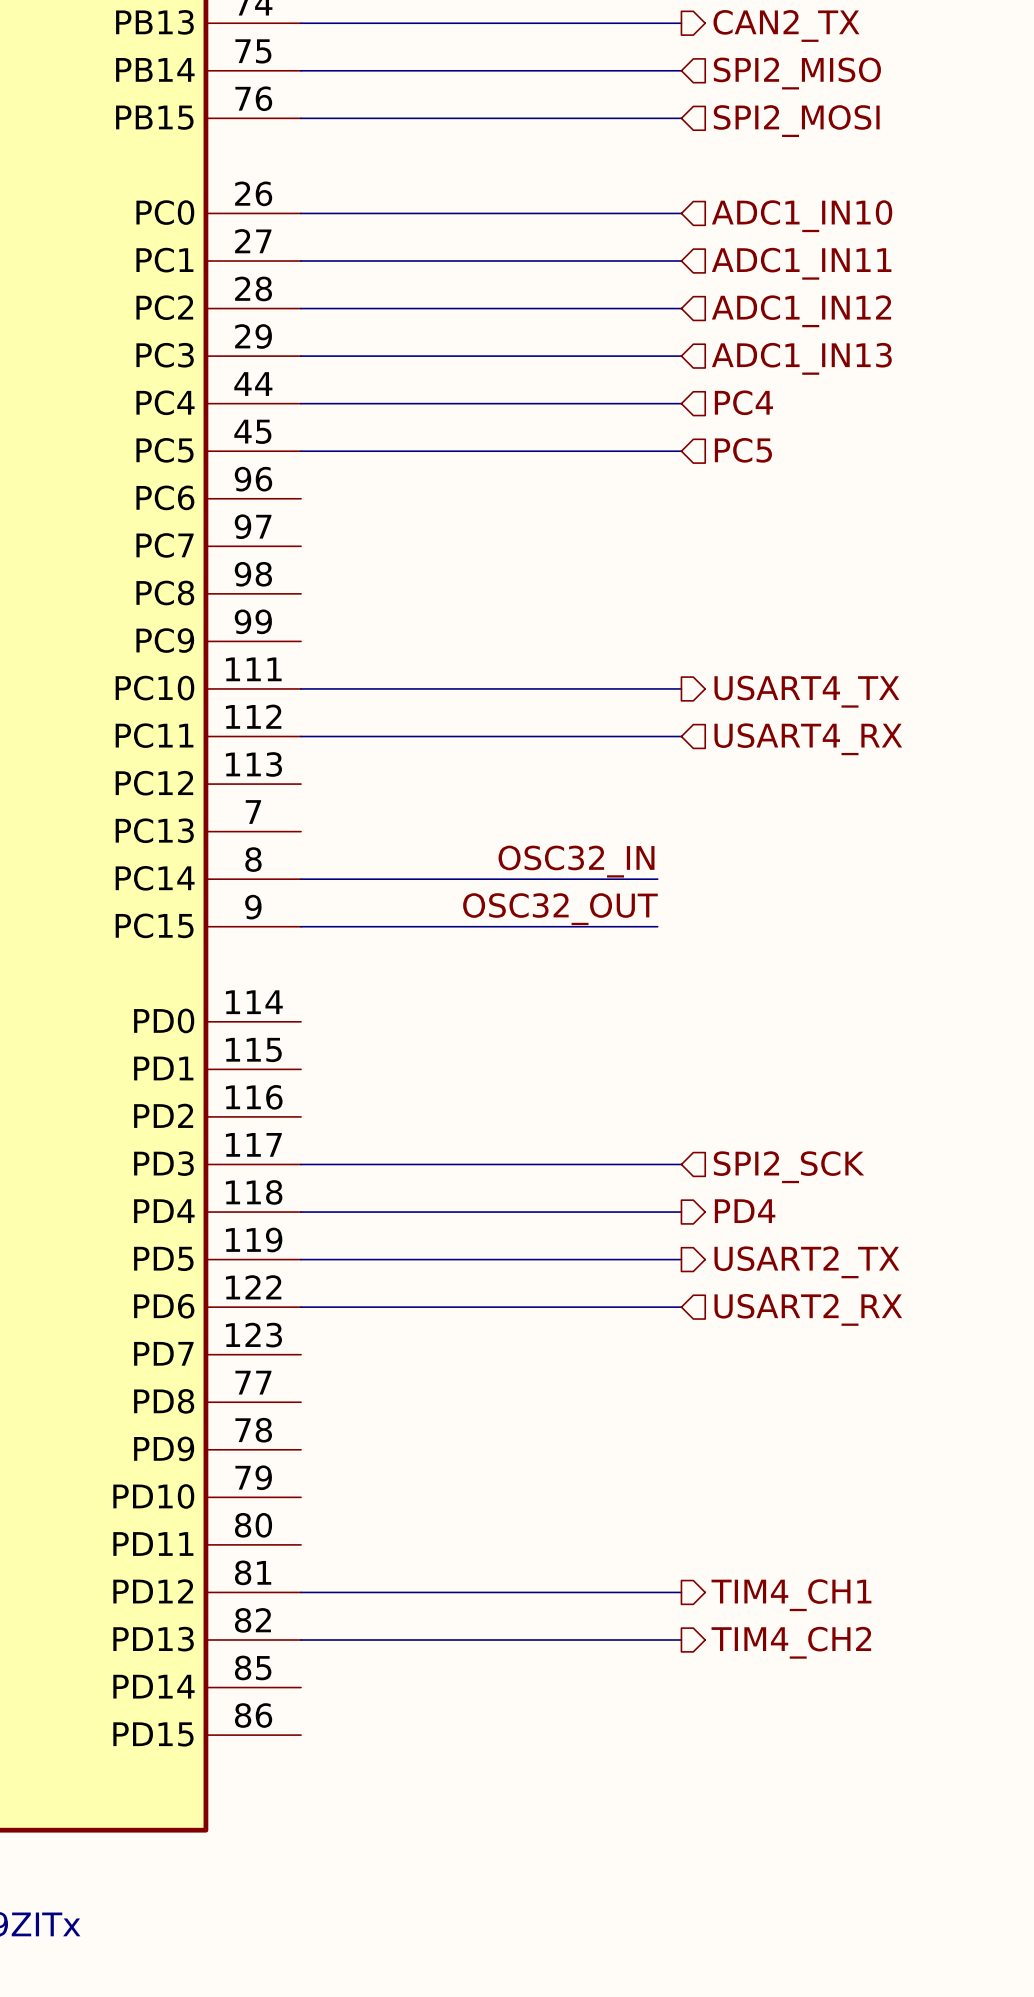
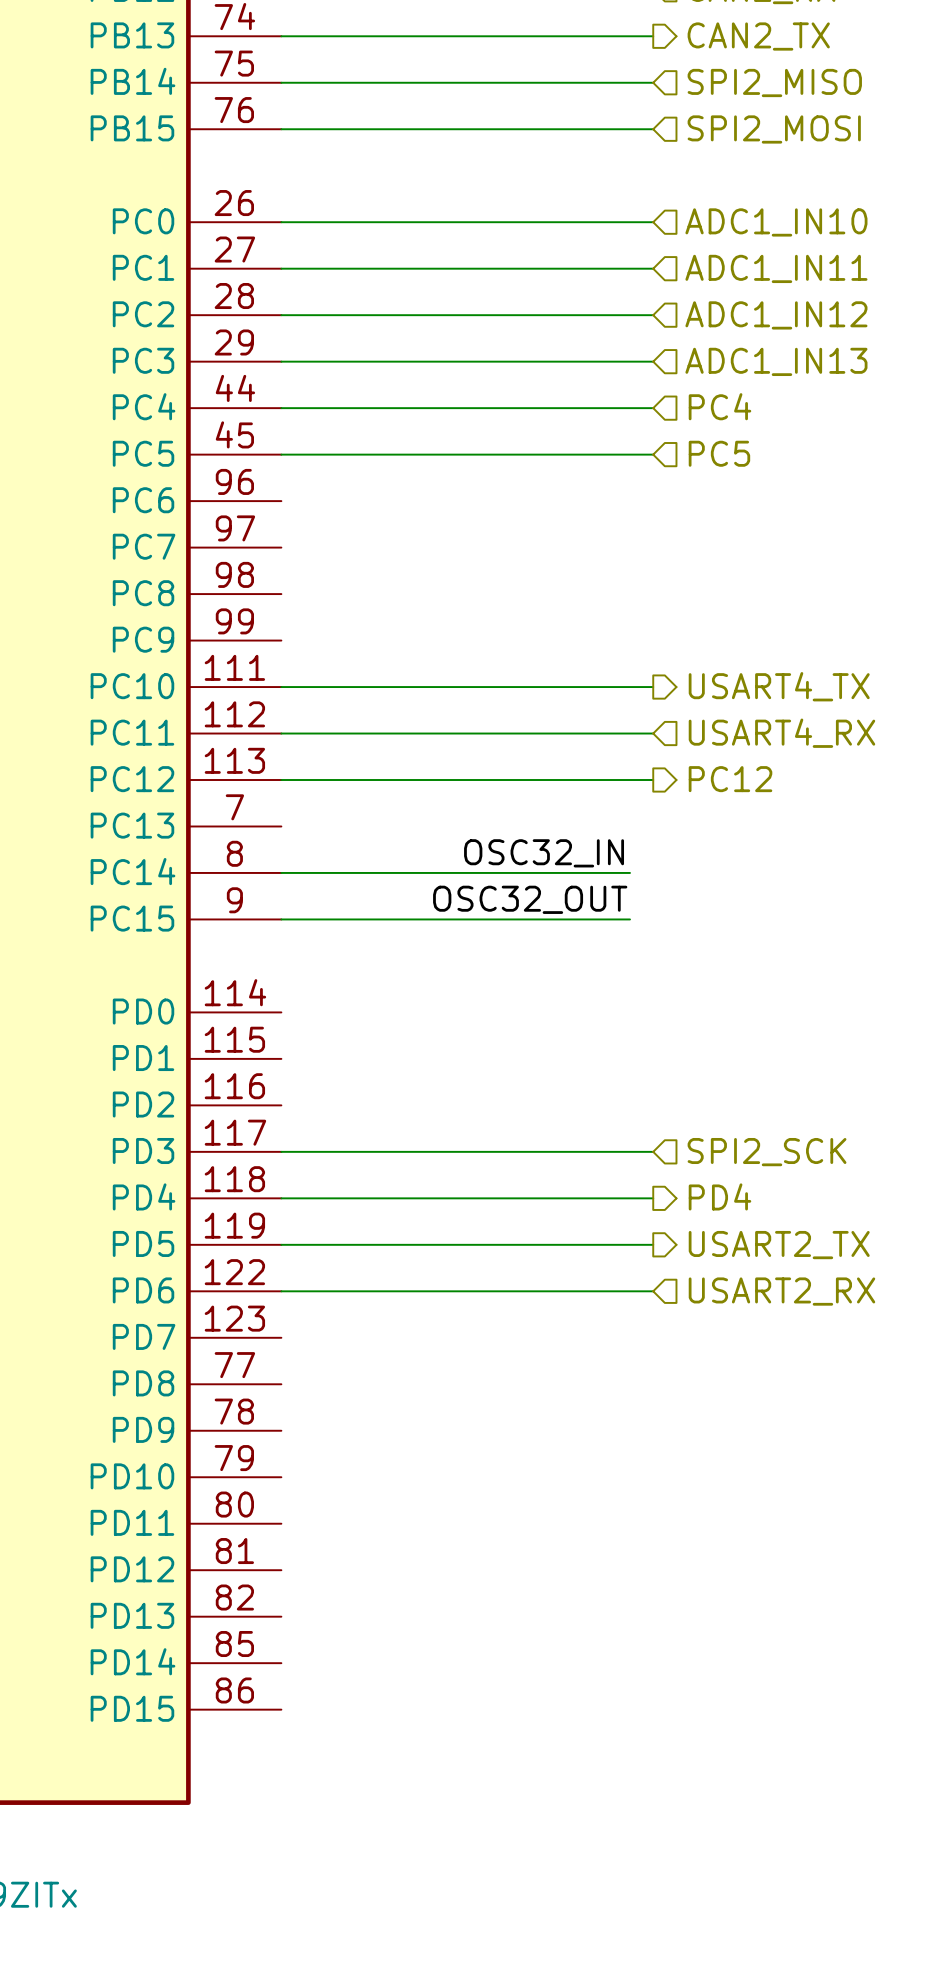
hierarchical label: none -> PC12 (730, 779)
wire: none -> (281, 780) (653, 780)
wire: (301, 1592) (681, 1592) -> none
hierarchical label: TIM4_CH1 (791, 1595) -> none
wire: (301, 1640) (681, 1640) -> none
hierarchical label: TIM4_CH2 (791, 1642) -> none

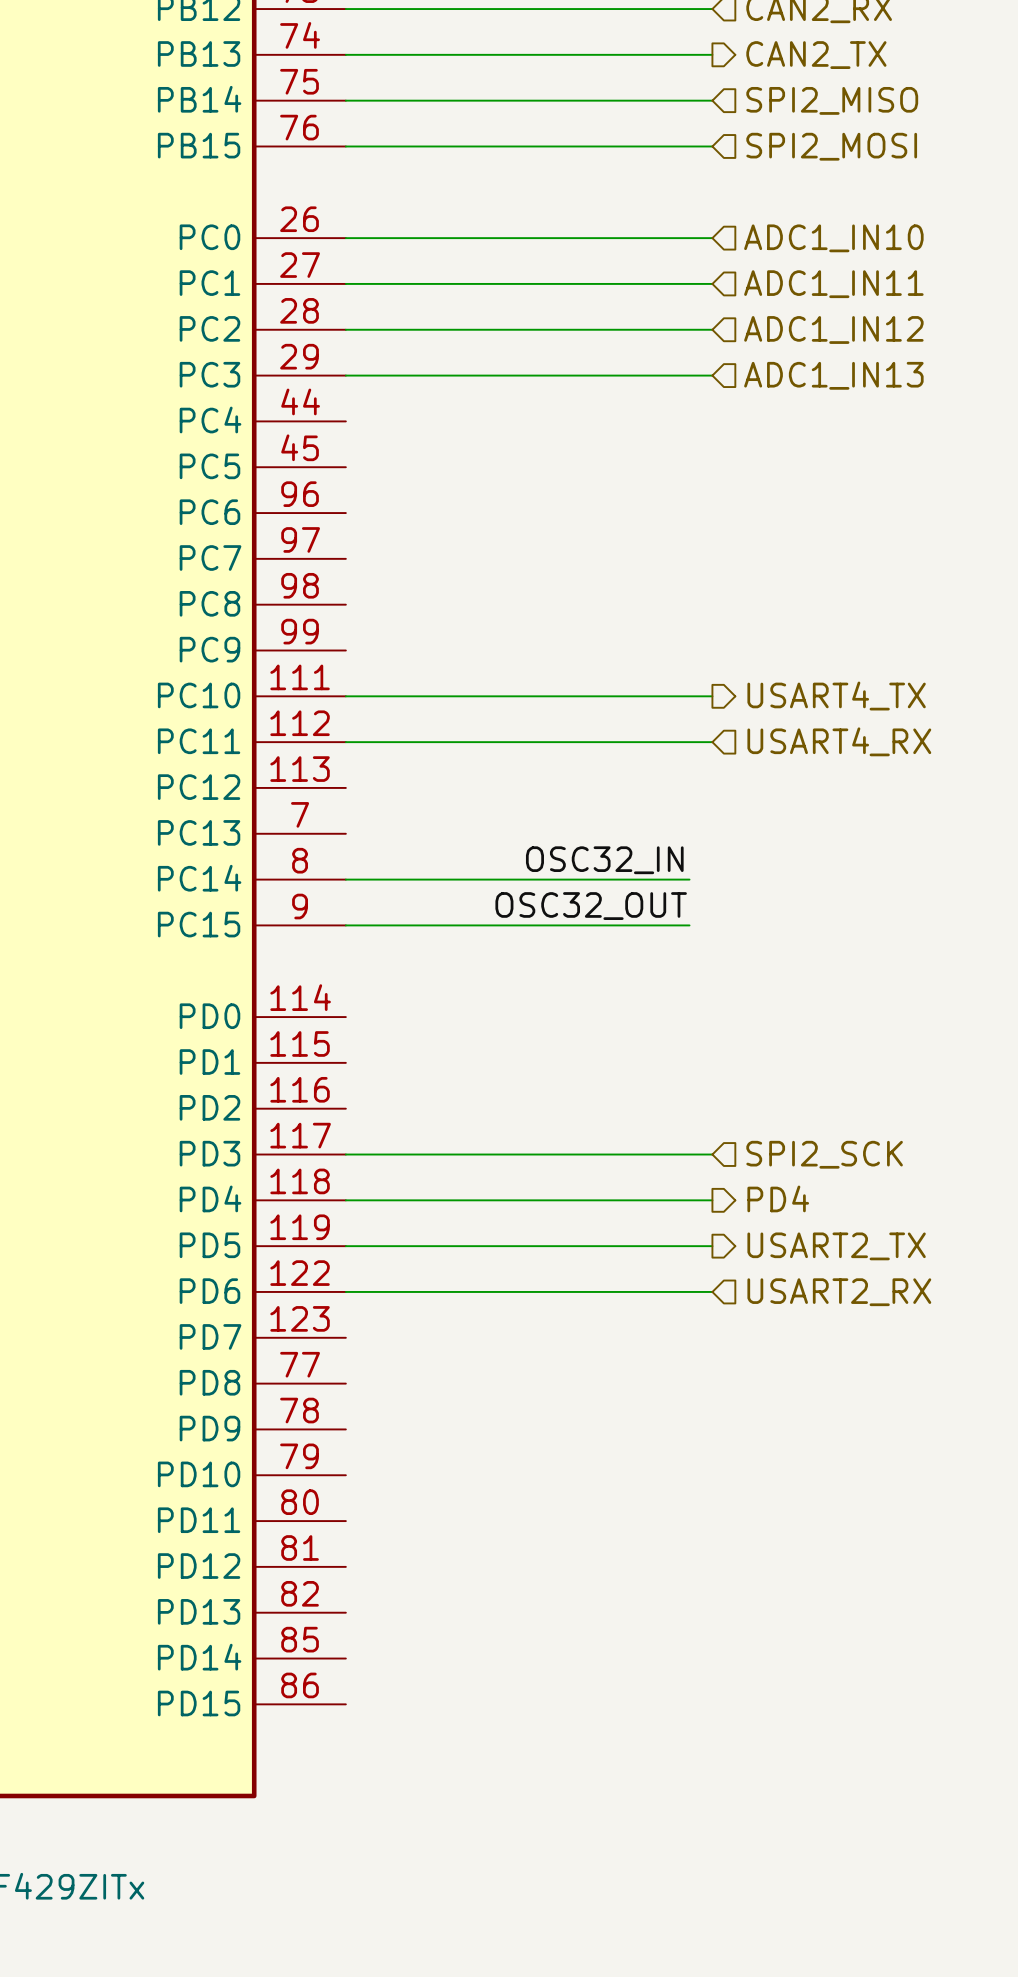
hierarchical label: PC4 (720, 406) -> none
wire: (281, 408) (653, 408) -> none
hierarchical label: PC5 (719, 453) -> none
wire: (281, 454) (653, 454) -> none
hierarchical label: PC12 (730, 779) -> none
wire: (281, 780) (653, 780) -> none

